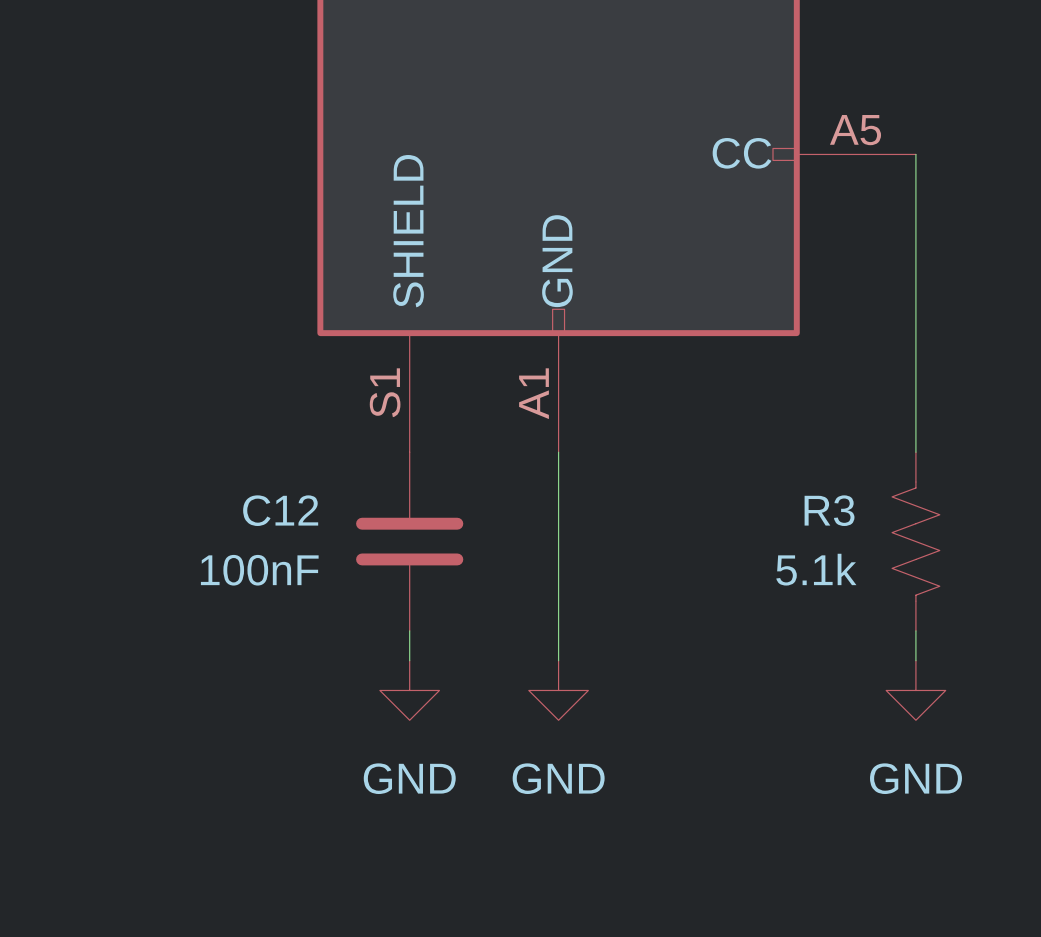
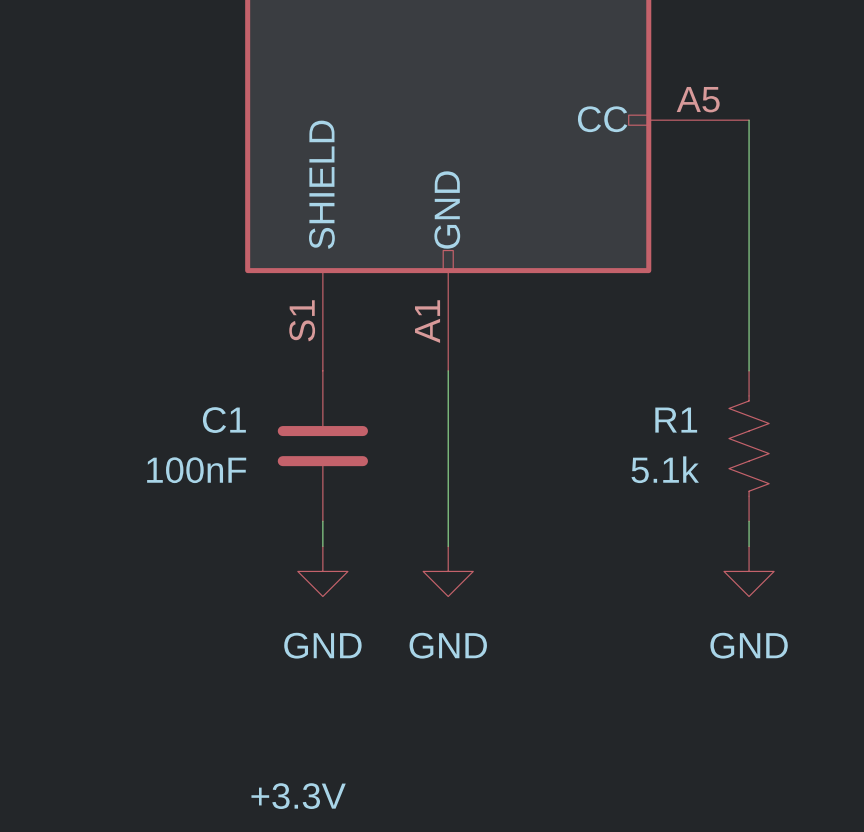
C12 name: C12 (280, 510) -> C1 (224, 420)
R3 name: R3 (829, 510) -> R1 (676, 420)

